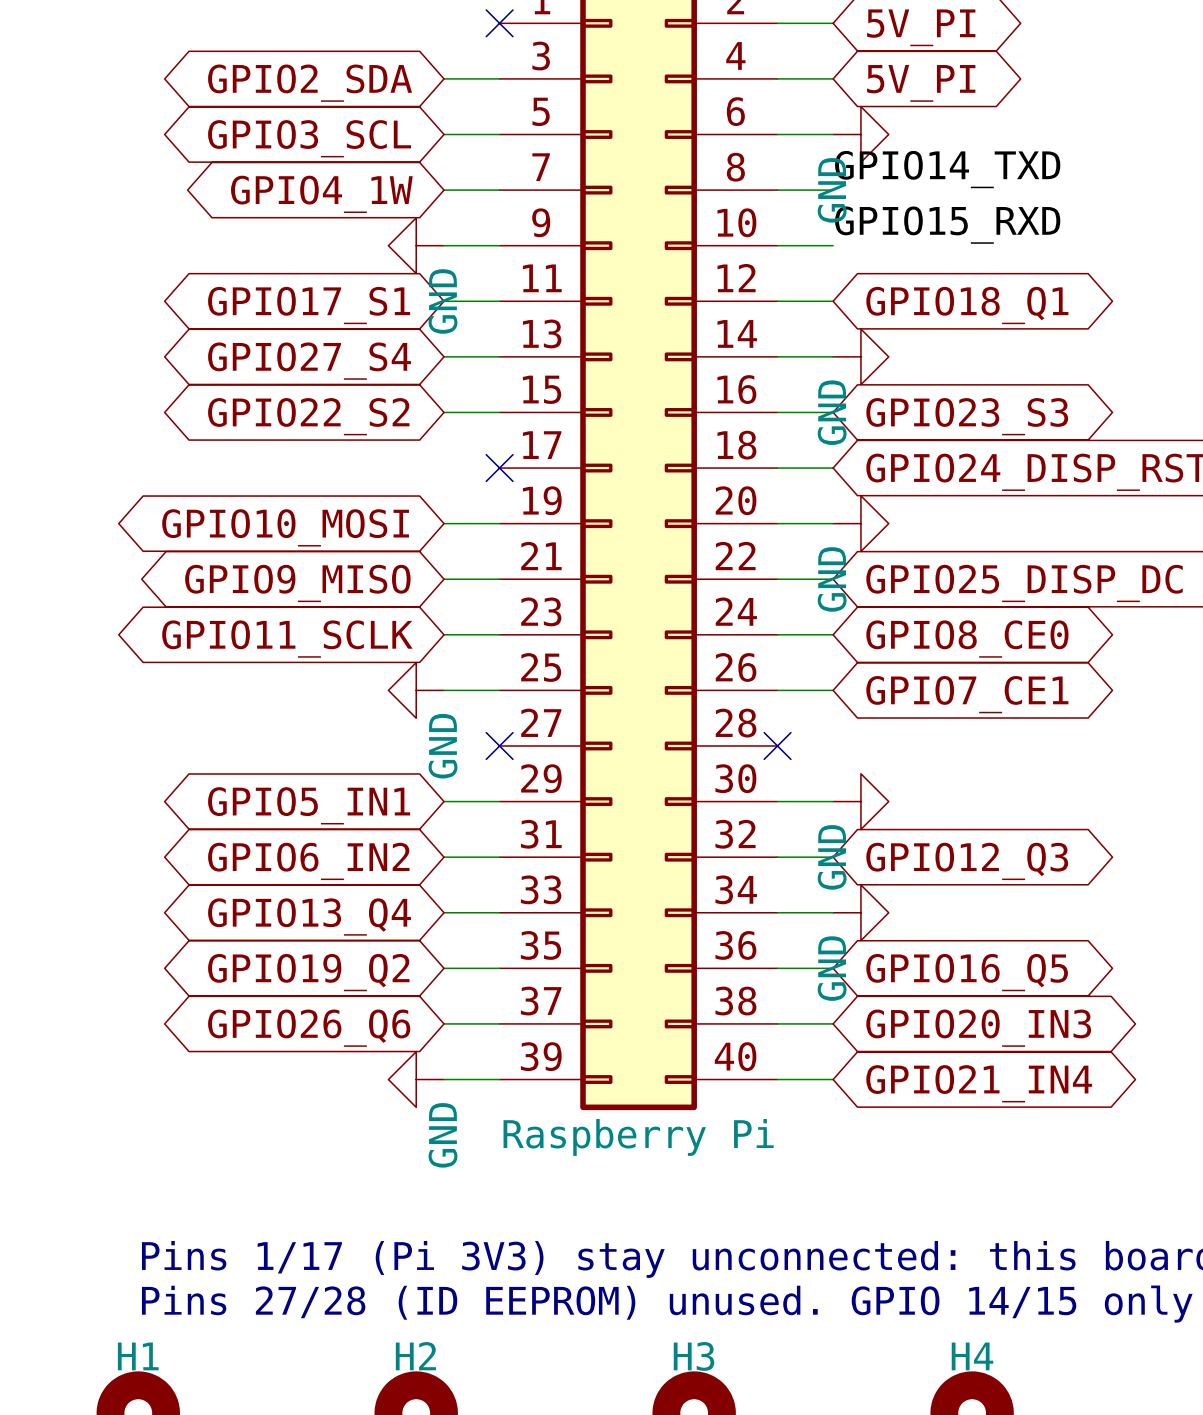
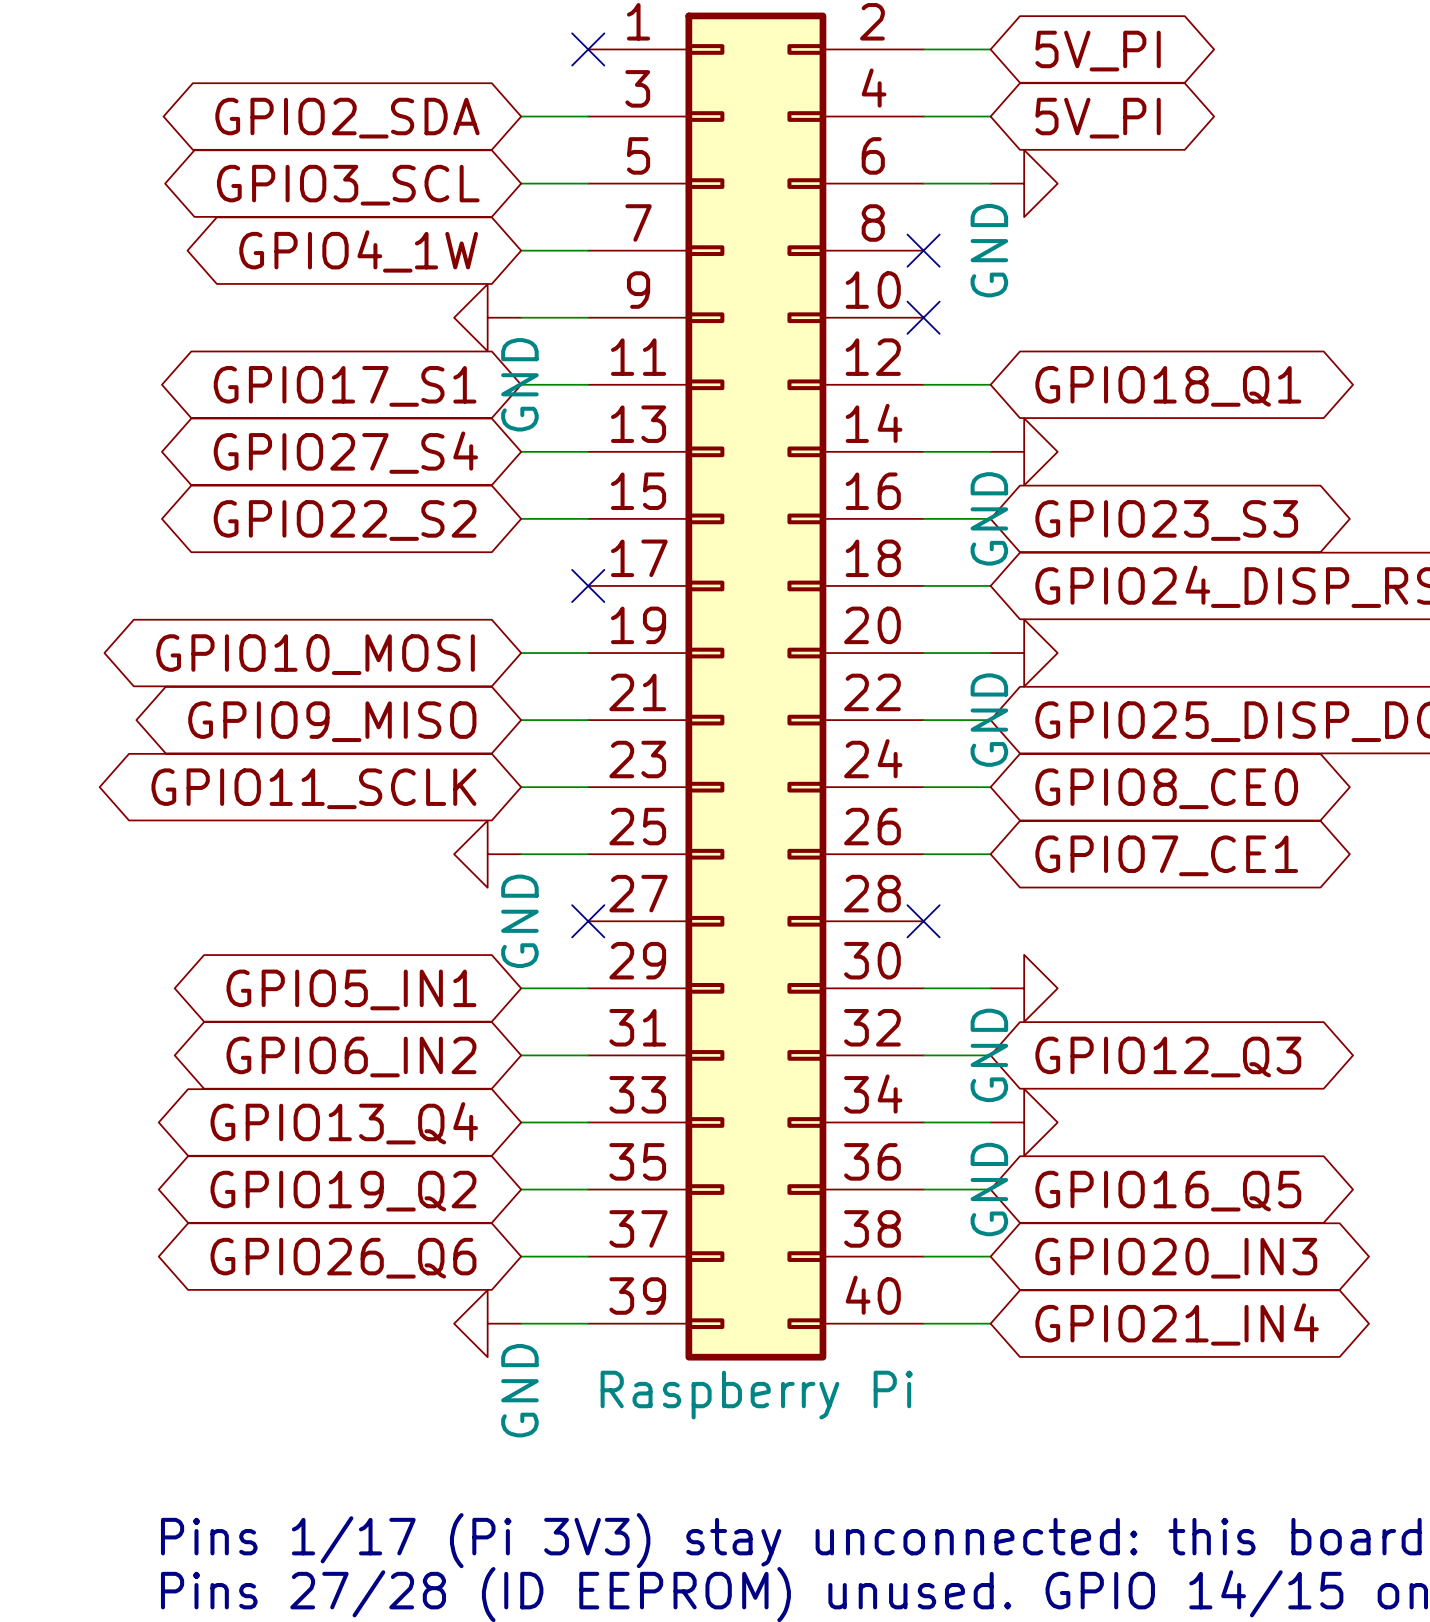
label: GPIO14_TXD (947, 169) -> none
wire: (777, 190) (833, 190) -> none
no-connect mark: none -> (923, 250)
label: GPIO15_RXD (947, 225) -> none
wire: (777, 245) (833, 245) -> none
no-connect mark: none -> (923, 317)

